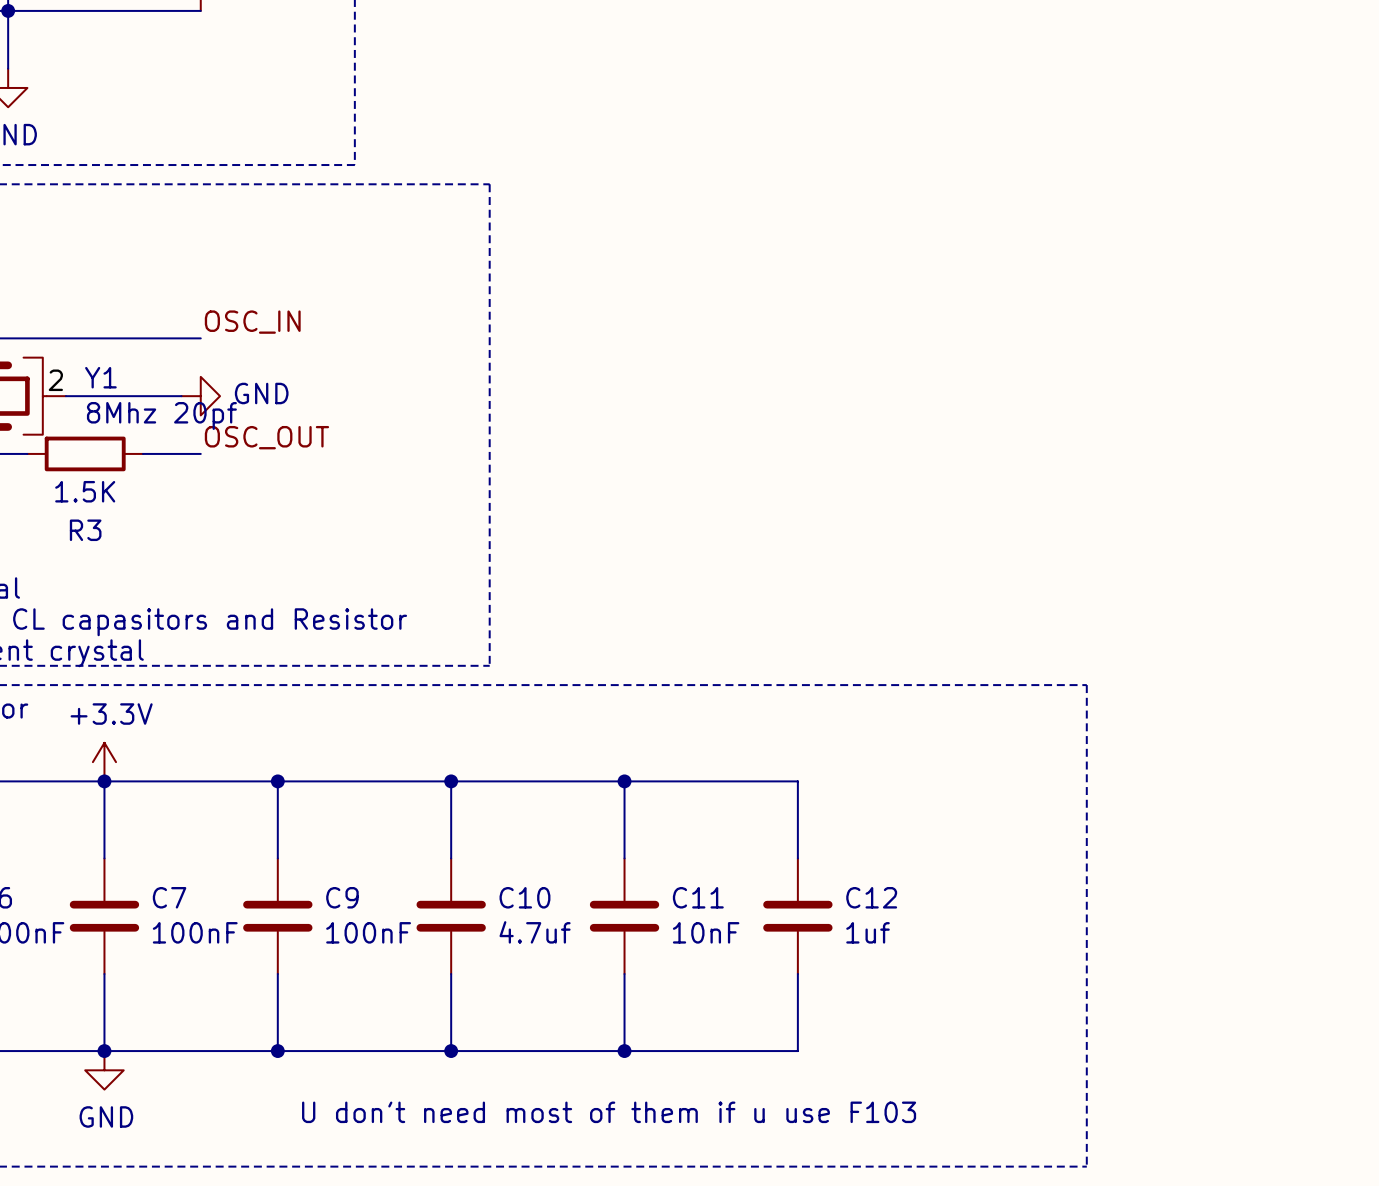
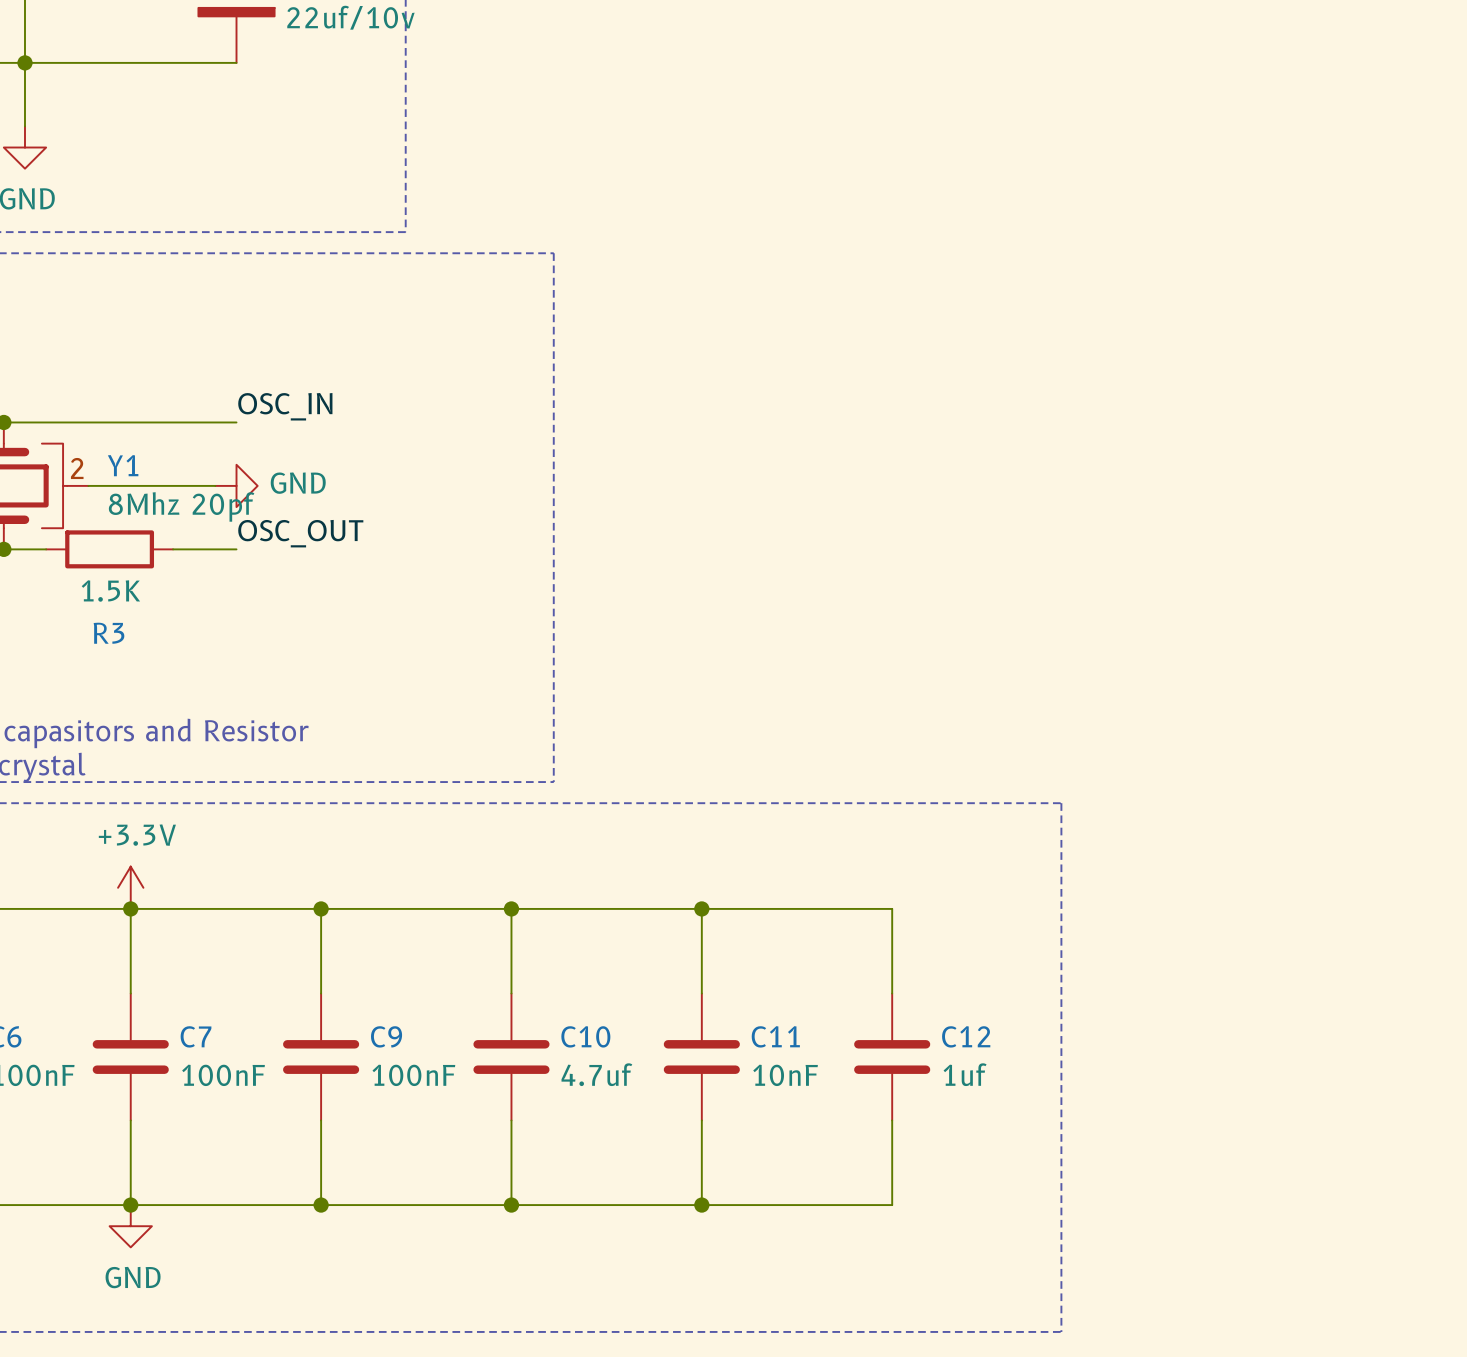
line: (951, 685) (1086, 685) (1086, 1166) (951, 1166) -> (1061, 803) (1061, 1331)
text: U don't need most of them if u use F103 (609, 1112) -> none

